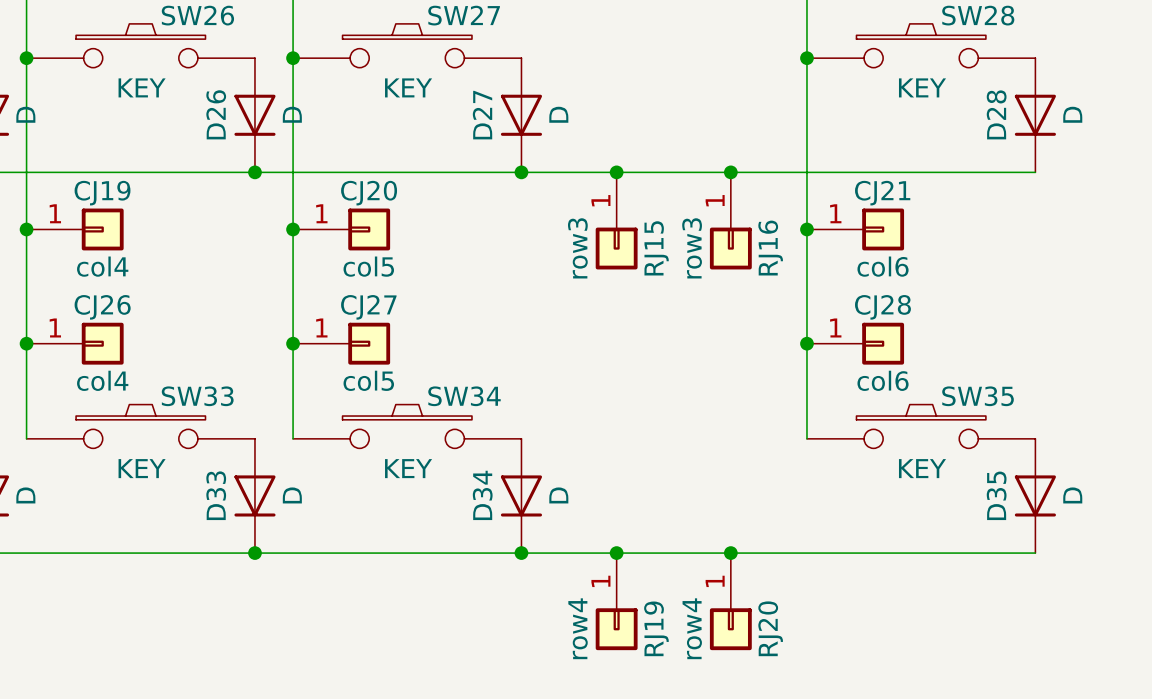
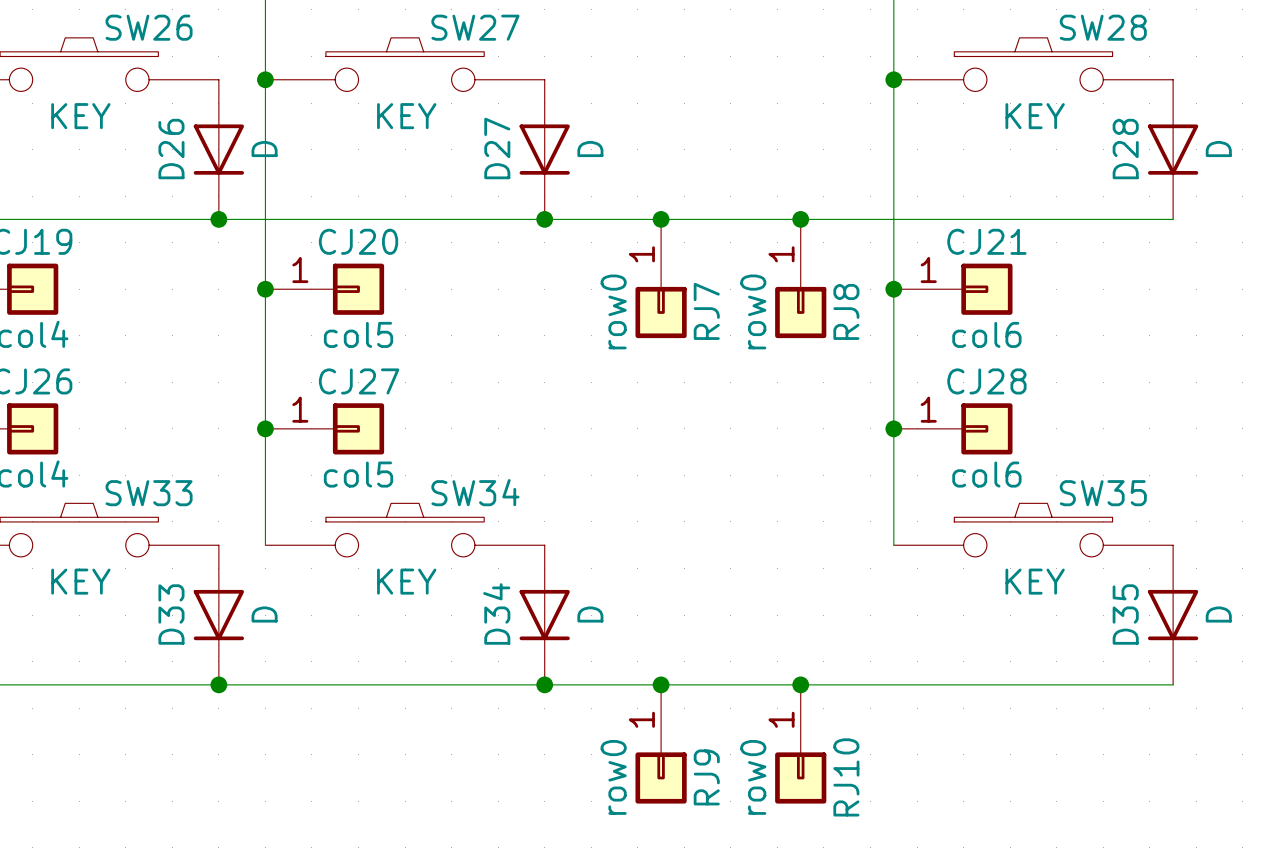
RJ15 value: row3 (577, 248) -> row0 (613, 311)
RJ15 name: RJ15 (656, 248) -> RJ7 (706, 311)
RJ16 value: row3 (692, 248) -> row0 (753, 311)
RJ16 name: RJ16 (770, 248) -> RJ8 (846, 311)
RJ19 value: row4 (578, 628) -> row0 (613, 777)
RJ19 name: RJ19 (656, 628) -> RJ9 (706, 777)
RJ20 value: row4 (692, 628) -> row0 (753, 777)
RJ20 name: RJ20 (770, 628) -> RJ10 (846, 777)

